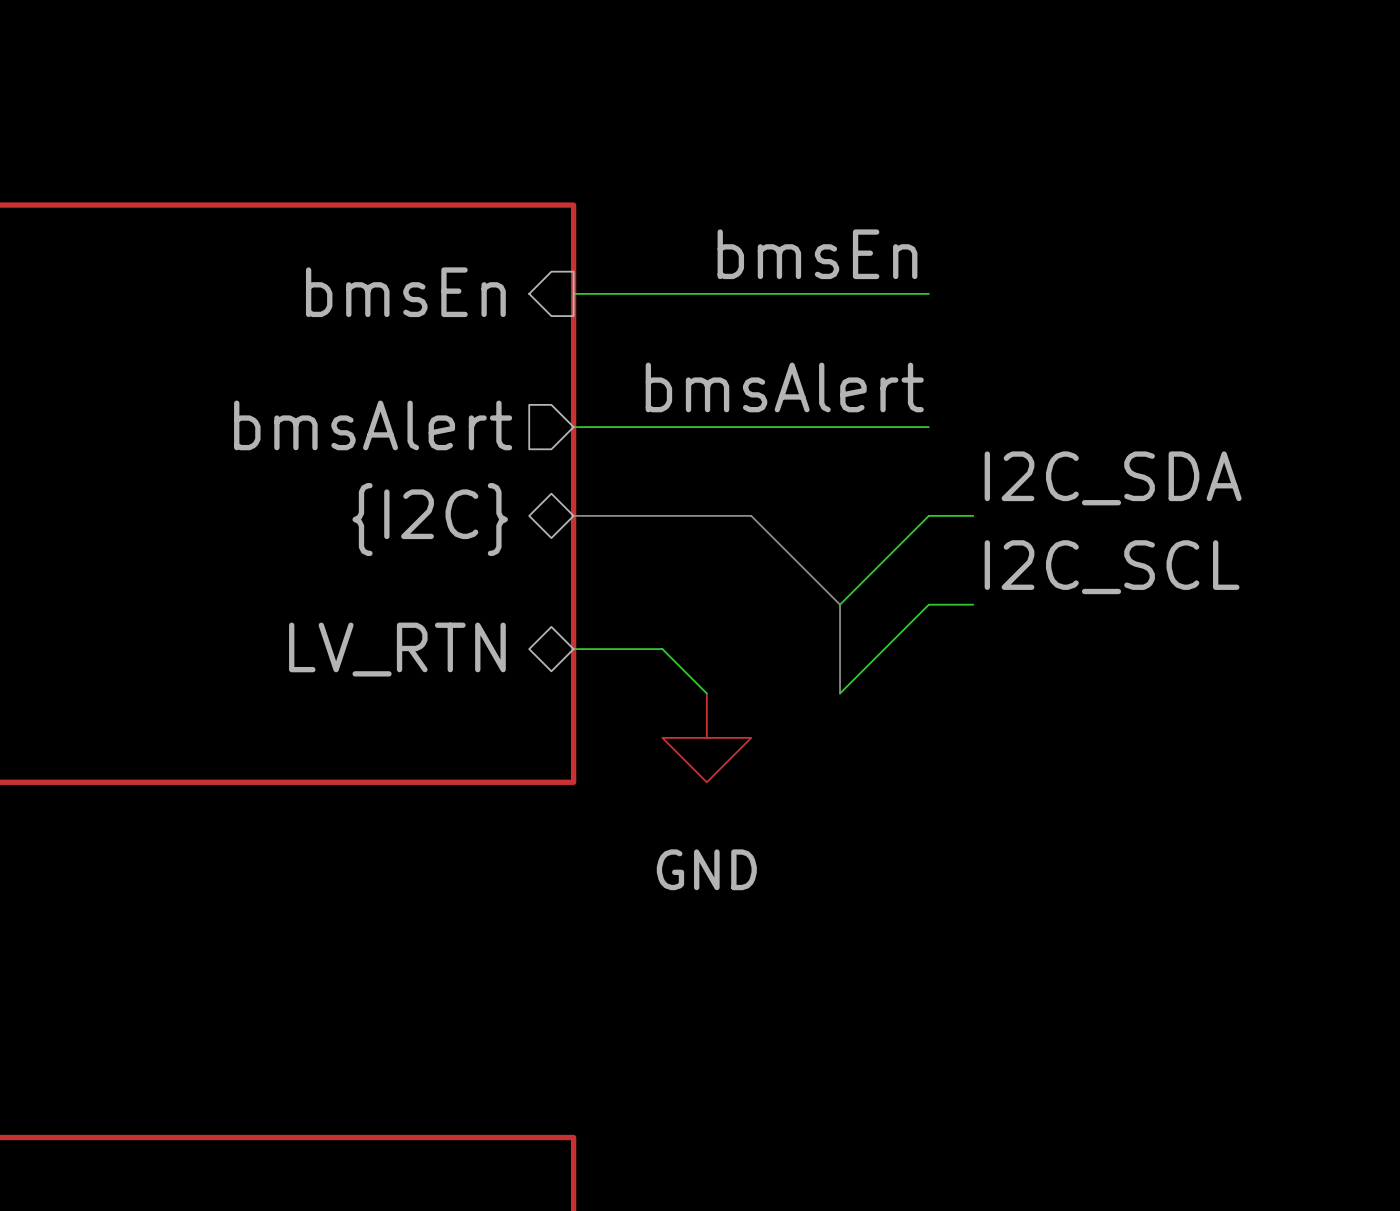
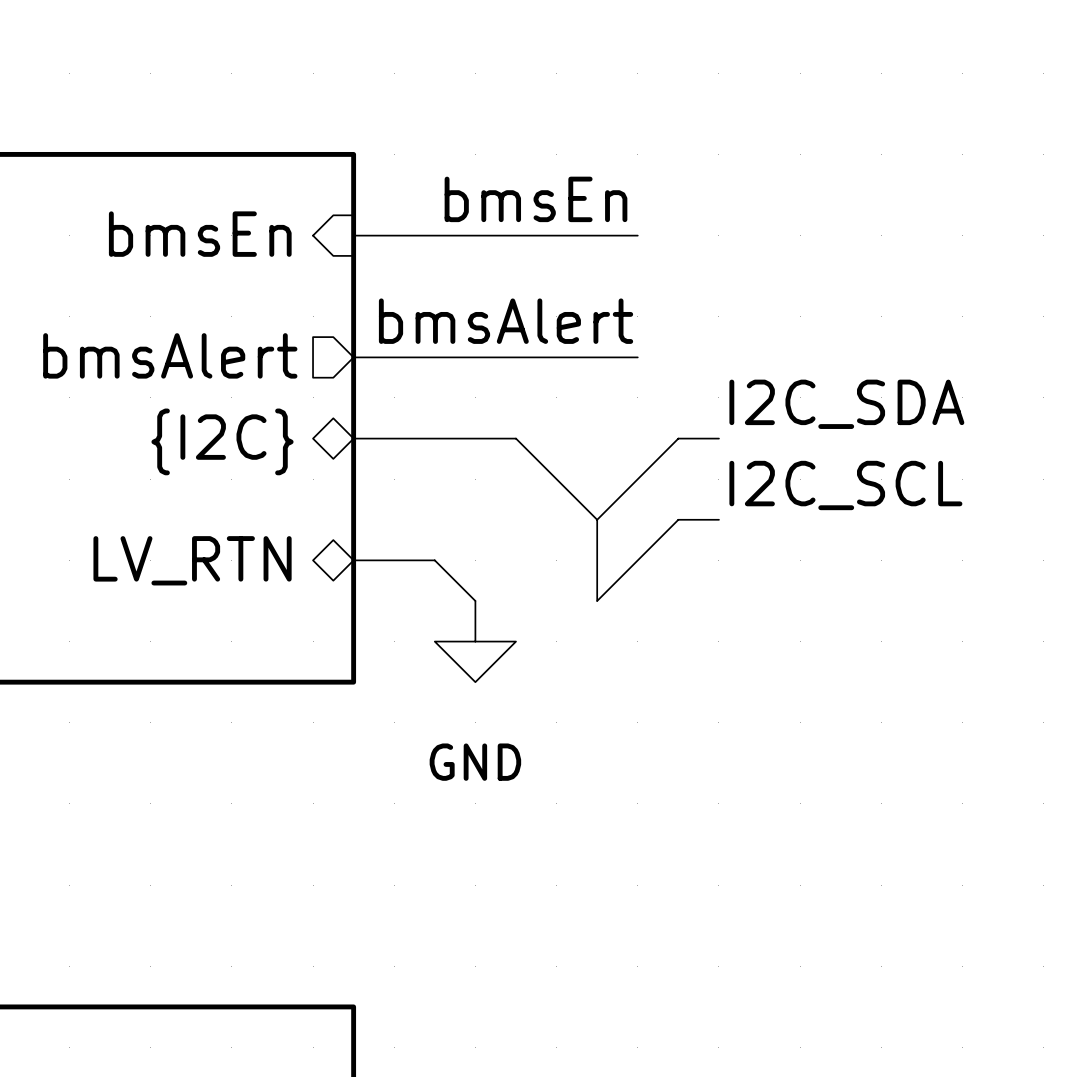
label position: bmsEn (817, 254) -> bmsEn (535, 199)
wire: (884, 293) (928, 293) -> none
label position: bmsAlert (784, 387) -> bmsAlert (506, 321)
wire: (884, 427) (928, 427) -> none

